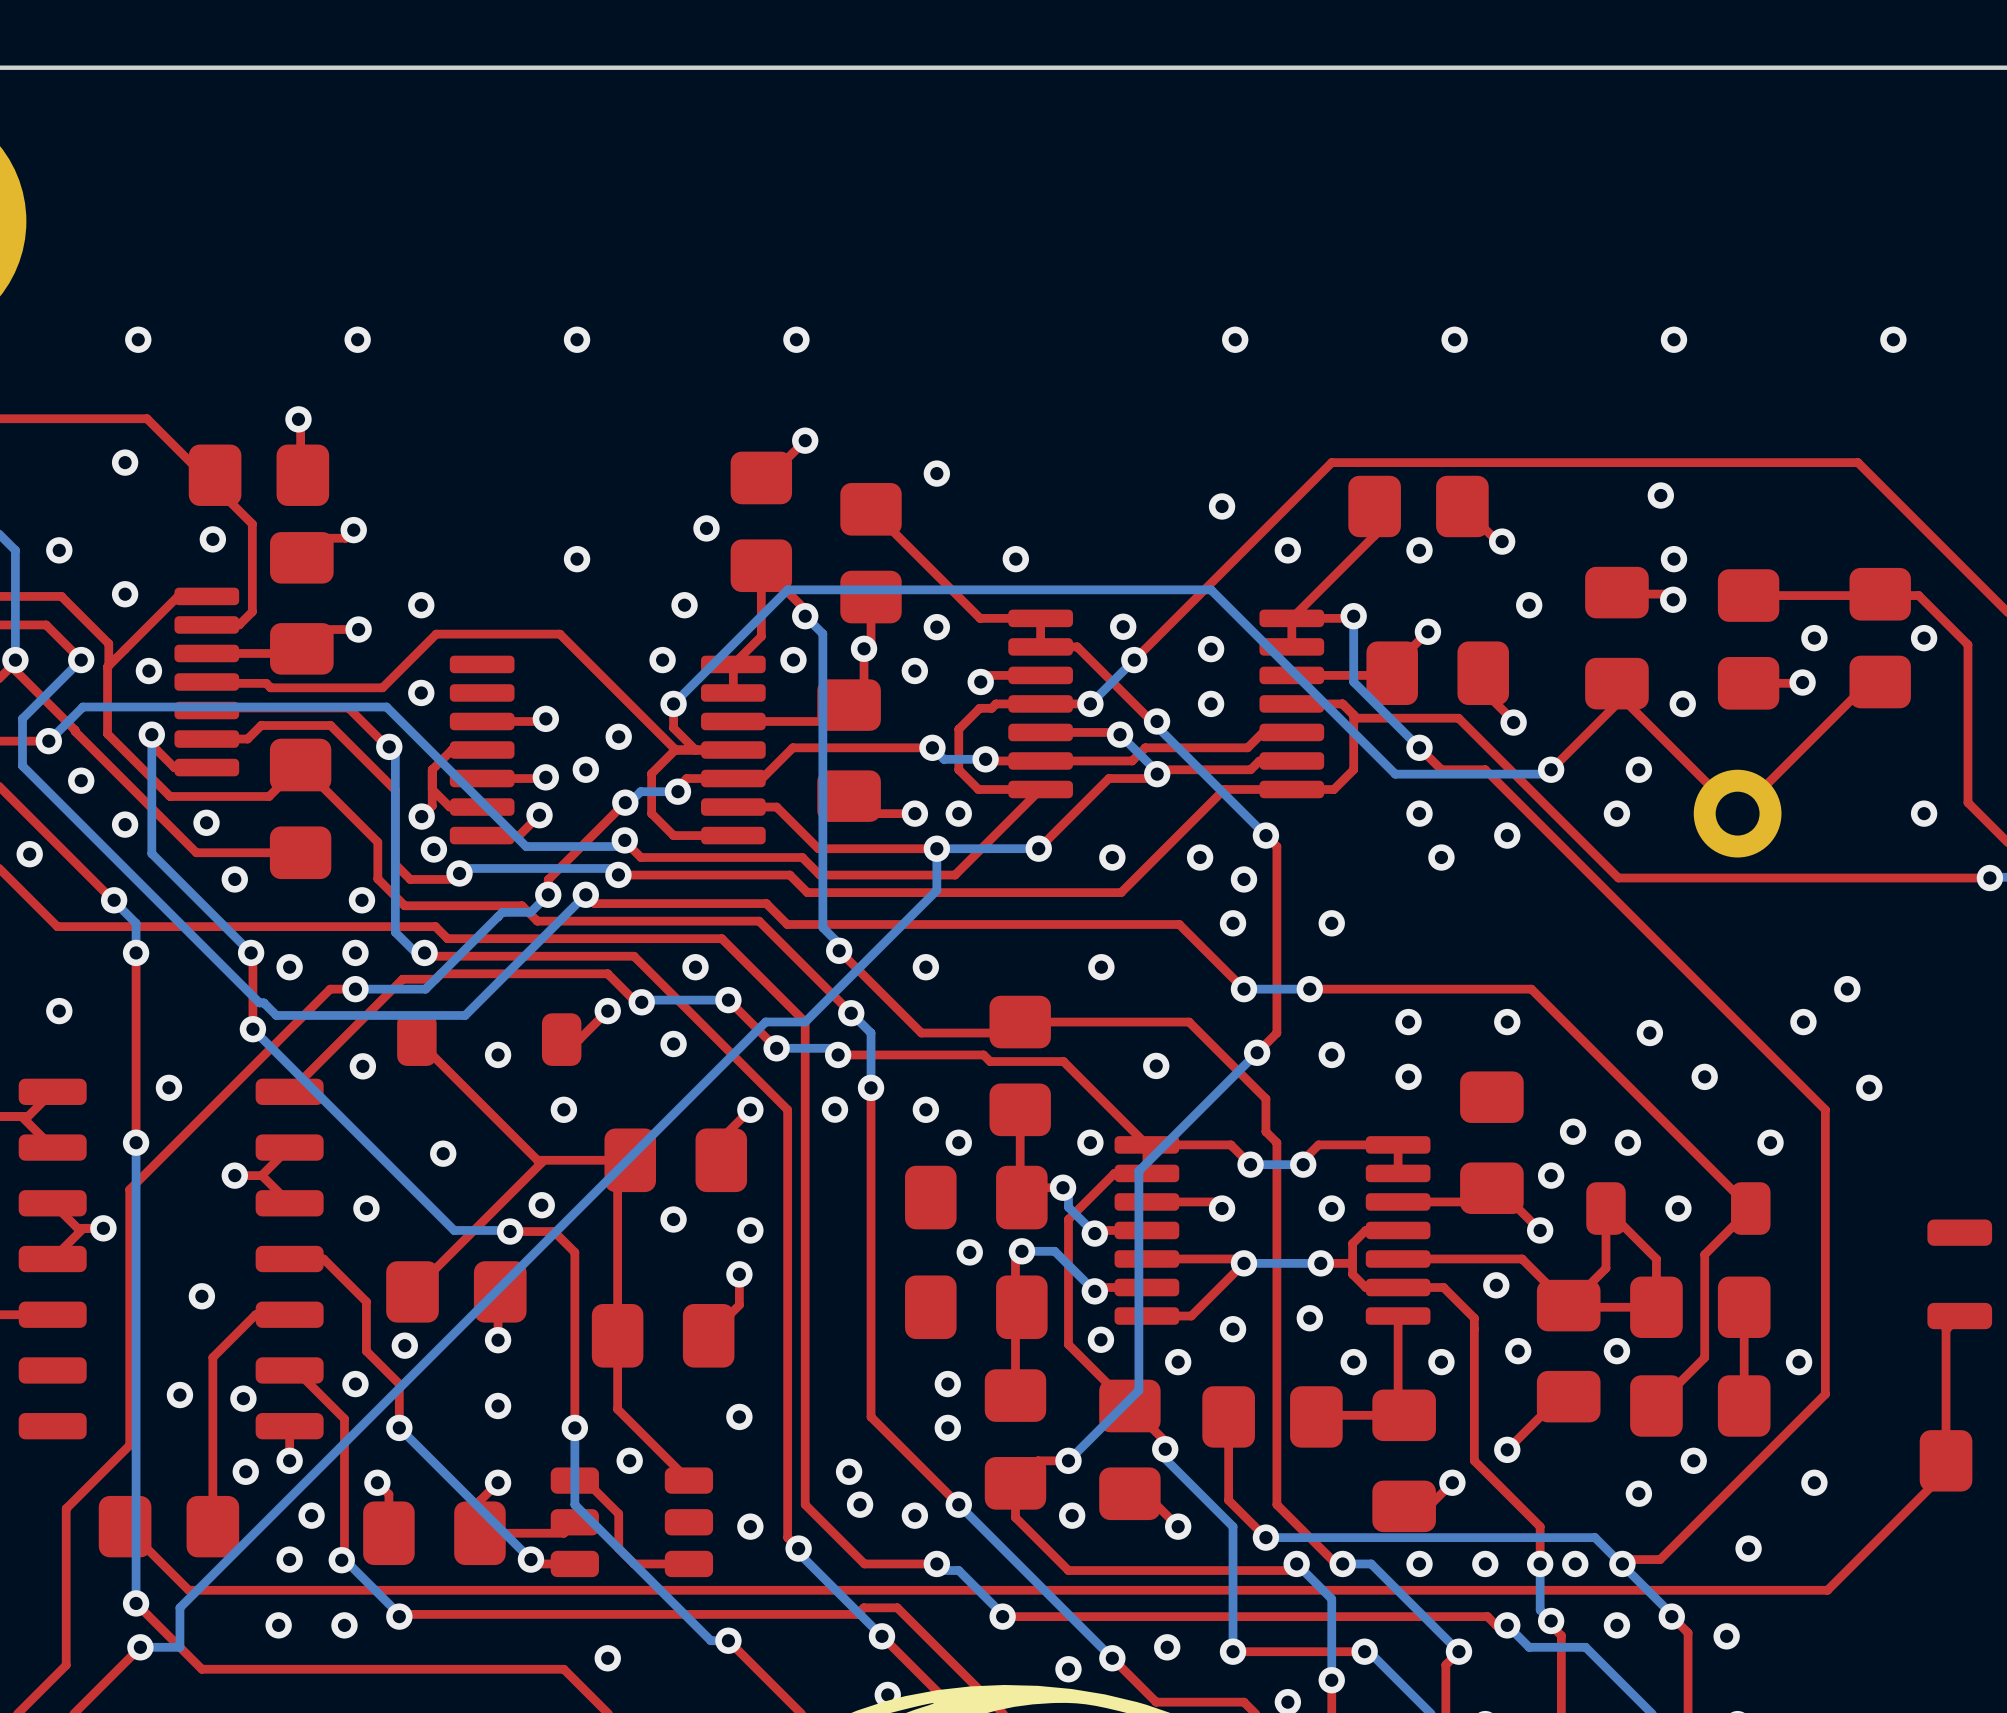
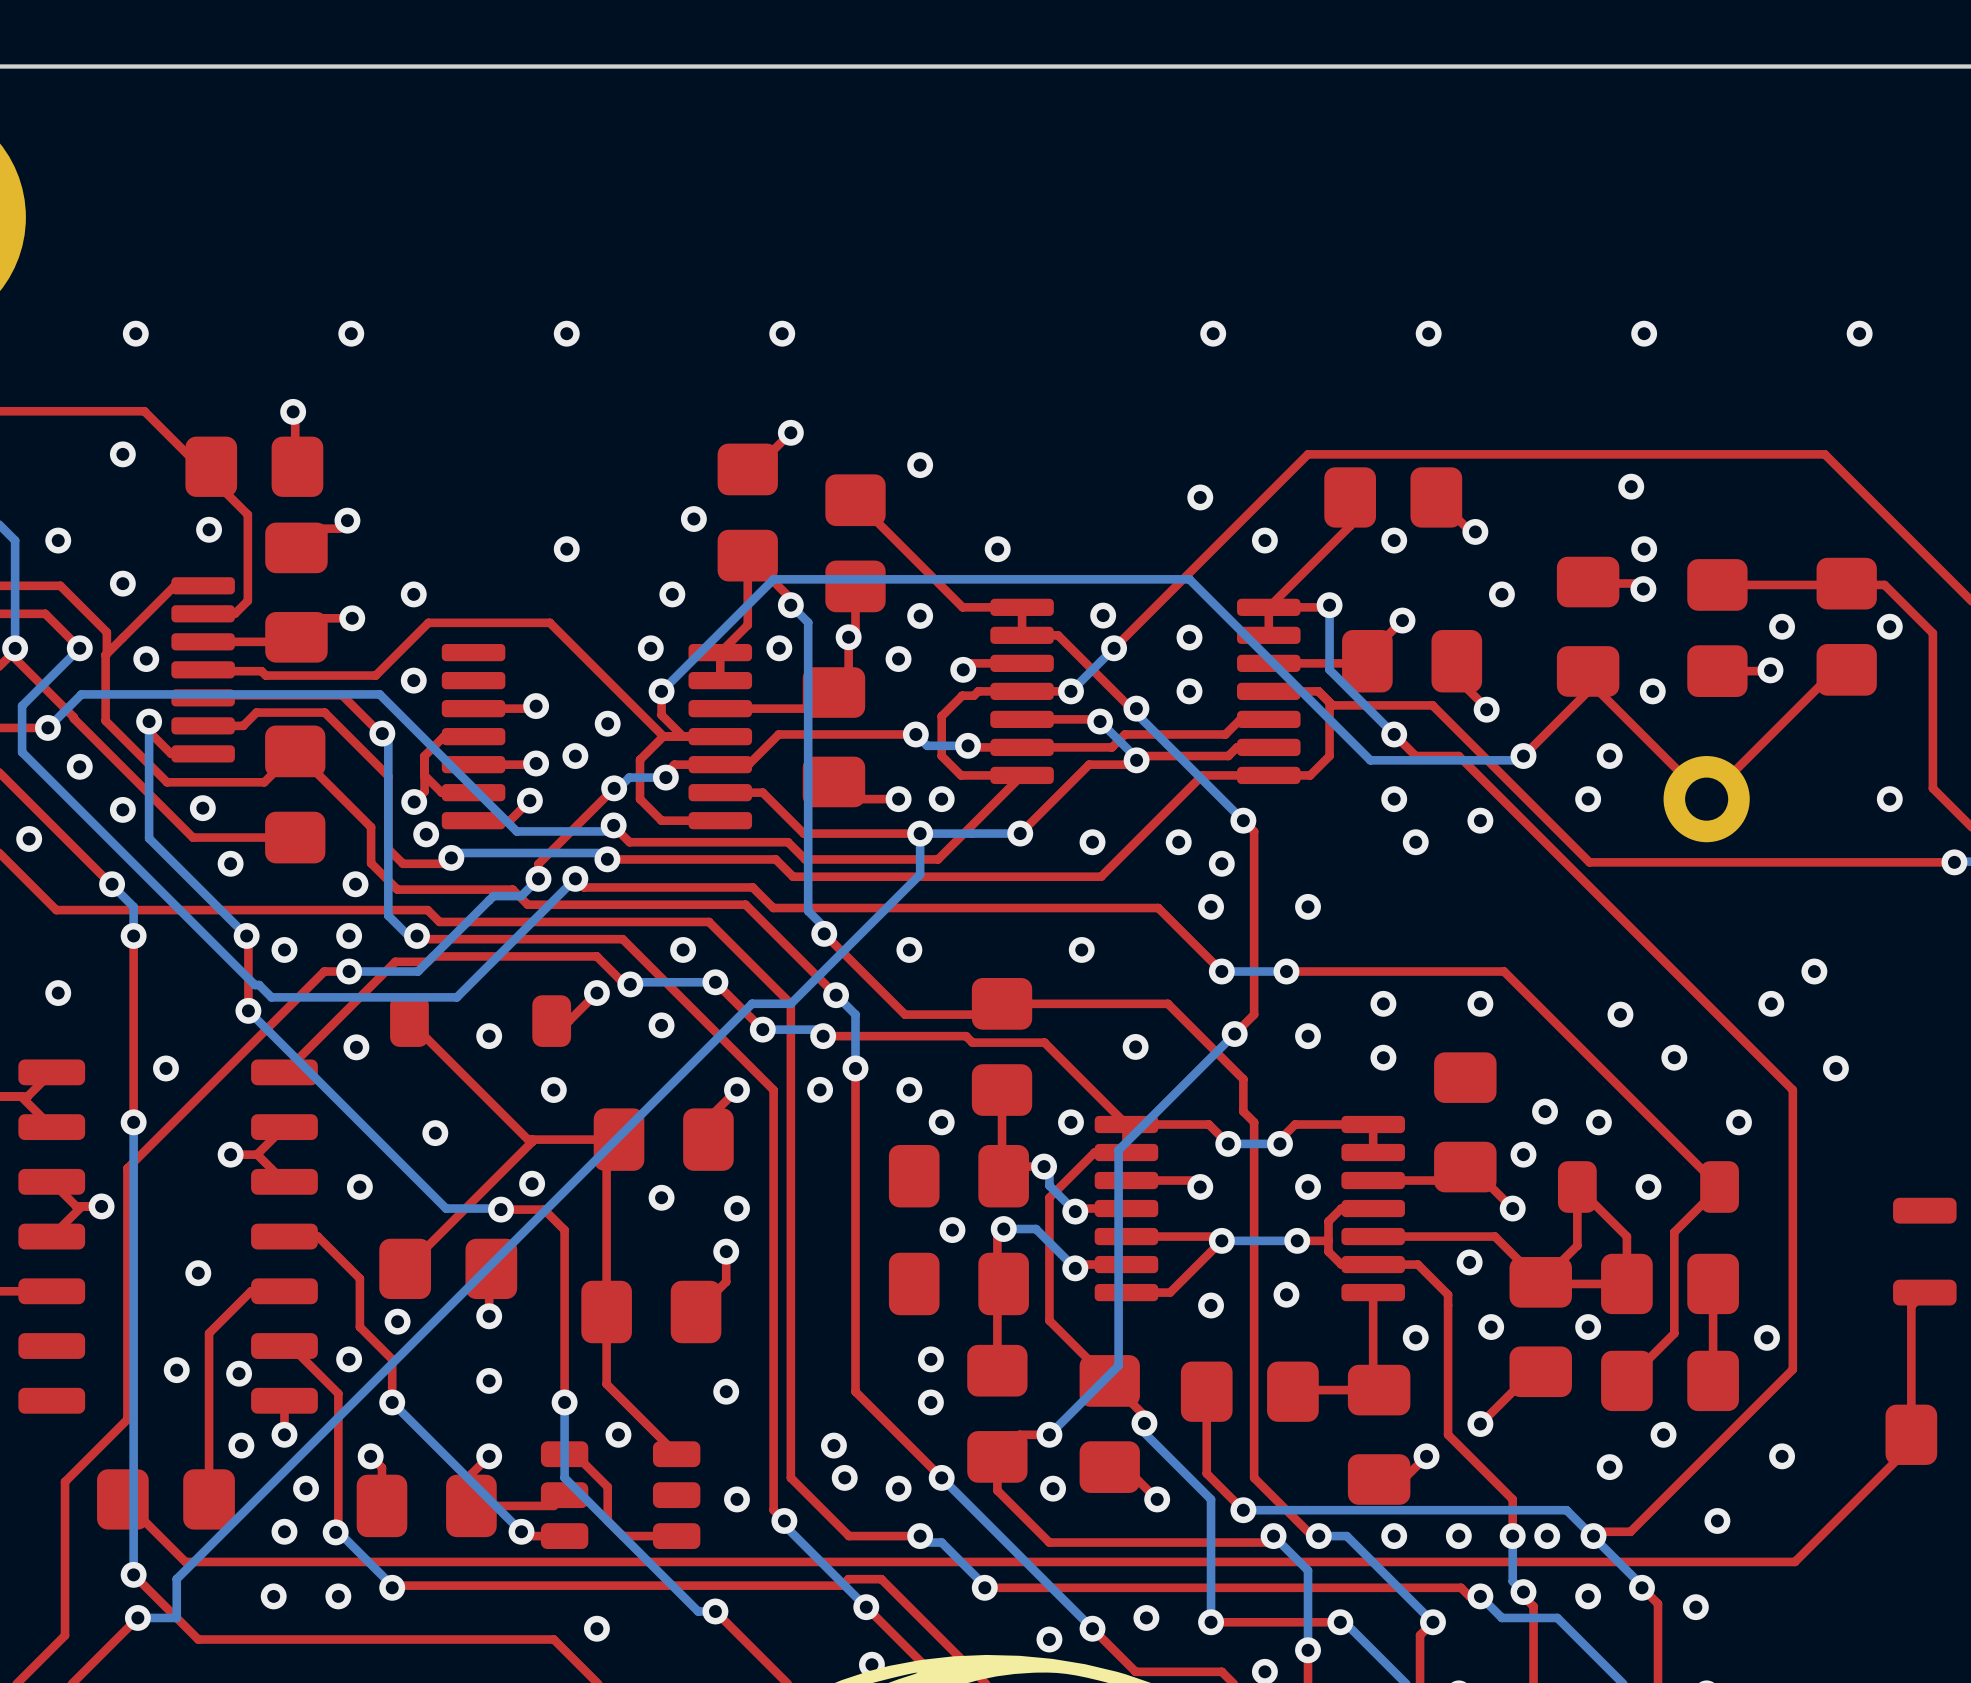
via: (1100, 1339) -> none
via: (1178, 1362) -> none
via: (1353, 1362) -> none

